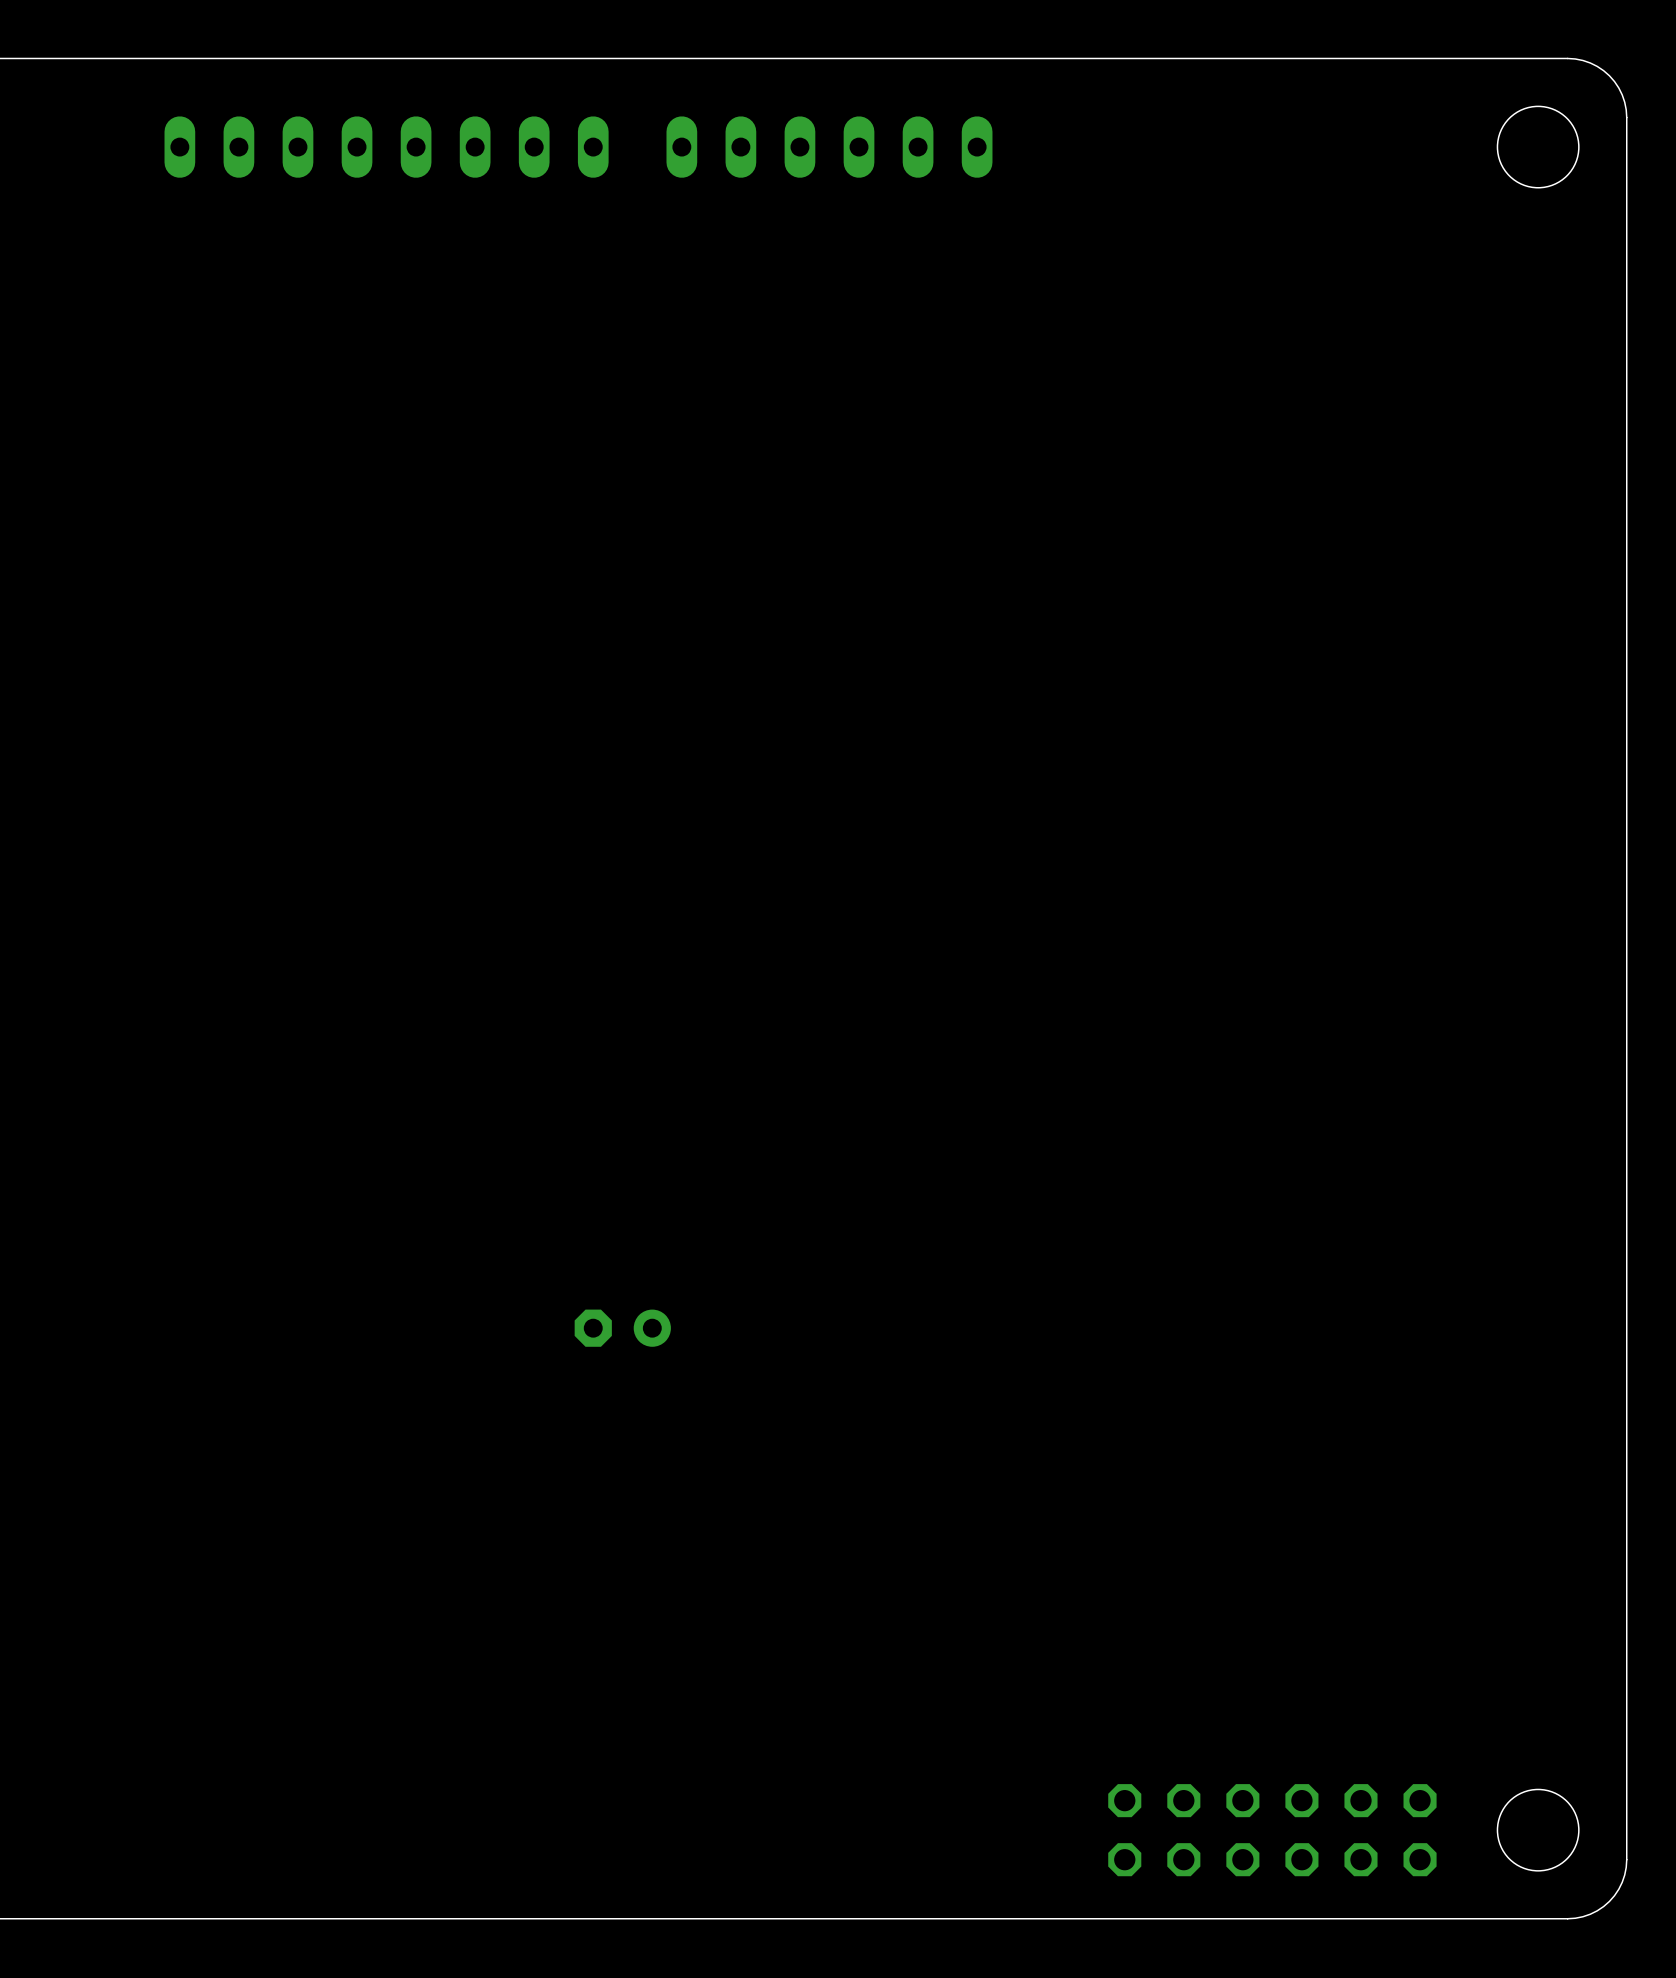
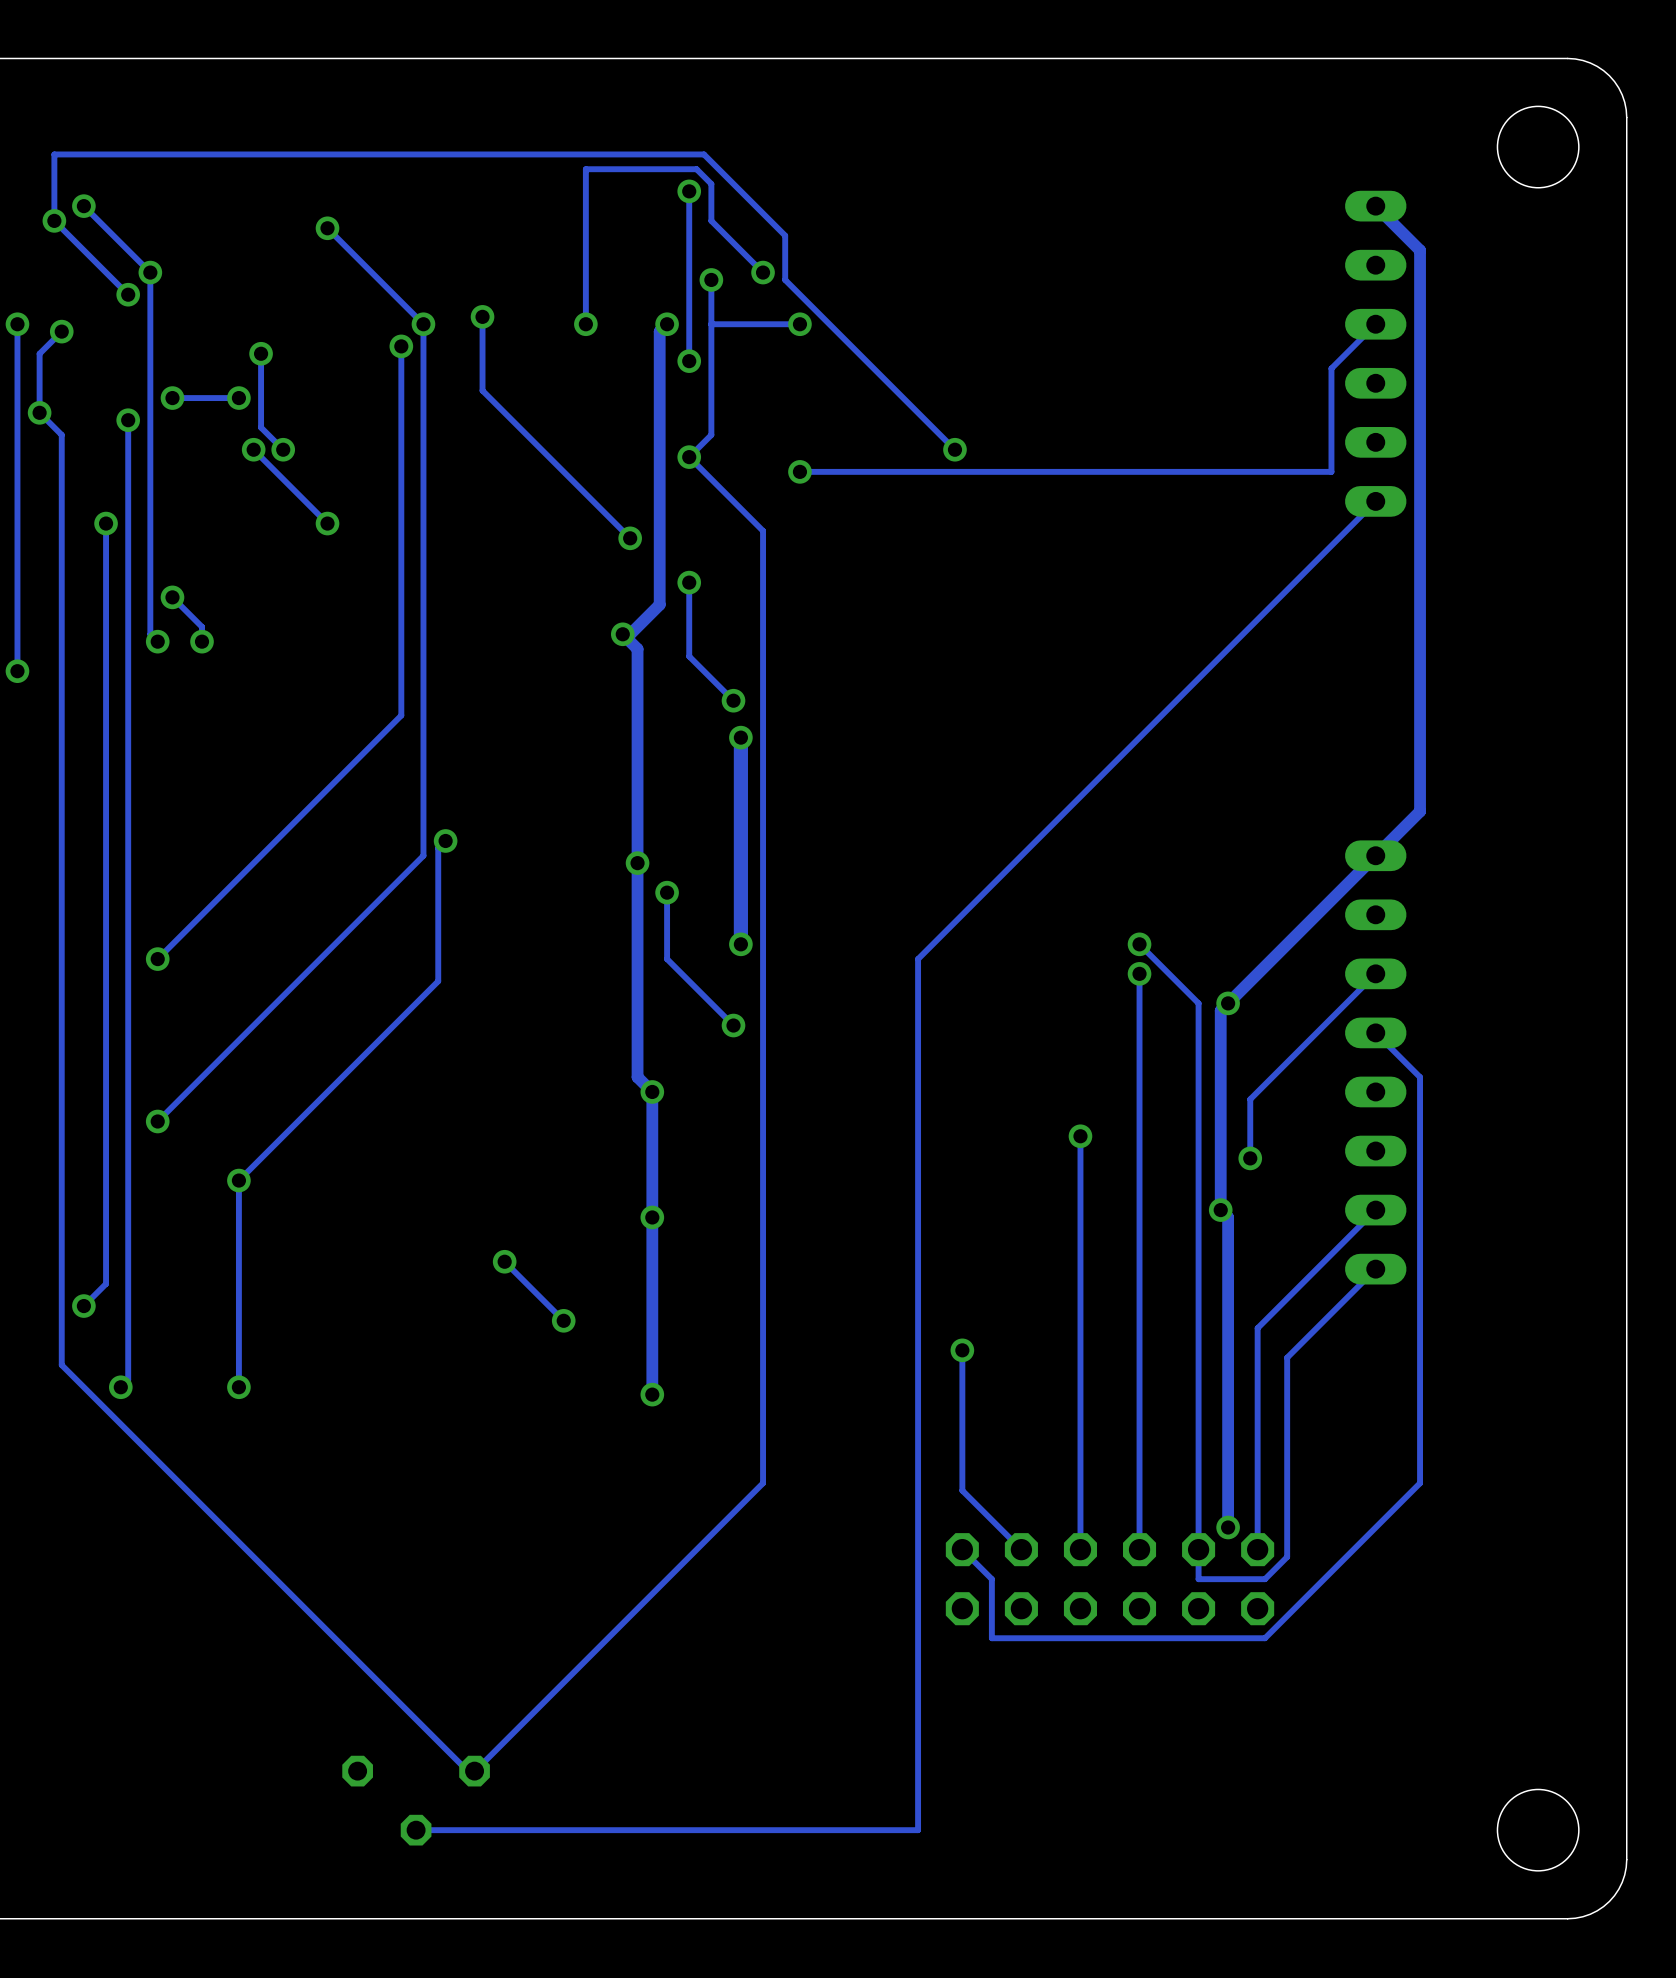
part: (386, 147) -> none
part: (829, 147) -> none
track: none -> (689, 191) (689, 361)
via: none -> (689, 191)
track: none -> (83, 206) (150, 272) (150, 634) (157, 641)
via: none -> (83, 206)
track: none -> (1375, 206) (1420, 250) (1420, 811) (1220, 1010) (1220, 1210) (1228, 1217) (1228, 1527)
via: none -> (54, 220)
track: none -> (327, 228) (423, 324) (423, 855) (157, 1121)
via: none -> (327, 228)
via: none -> (150, 272)
track: none -> (763, 272) (711, 220) (711, 183) (696, 169) (585, 169) (585, 324)
via: none -> (763, 272)
track: none -> (711, 279) (711, 434) (689, 457) (763, 530) (763, 1483) (475, 1771) (467, 1771) (61, 1365) (61, 434) (39, 412) (39, 353) (61, 331)
via: none -> (711, 279)
track: none -> (128, 294) (54, 220) (54, 154) (703, 154) (785, 235) (785, 279) (954, 449)
via: none -> (128, 294)
track: none -> (482, 316) (482, 390) (630, 538)
via: none -> (482, 316)
track: none -> (17, 324) (17, 671)
via: none -> (17, 324)
via: none -> (423, 324)
via: none -> (585, 324)
track: none -> (667, 324) (659, 331) (659, 604) (630, 634) (622, 634) (637, 649) (637, 1077) (652, 1091) (652, 1394)
via: none -> (667, 324)
track: none -> (799, 324) (711, 324)
via: none -> (799, 324)
track: none -> (1375, 324) (1331, 368) (1331, 471) (799, 471)
via: none -> (61, 331)
track: none -> (401, 346) (401, 715) (157, 959)
via: none -> (401, 346)
track: none -> (261, 353) (261, 427) (283, 449)
via: none -> (261, 353)
part: none -> (1375, 353)
via: none -> (689, 361)
via: none -> (172, 398)
track: none -> (238, 398) (172, 398)
via: none -> (238, 398)
via: none -> (39, 412)
track: none -> (128, 420) (128, 1379) (120, 1387)
via: none -> (128, 420)
track: none -> (253, 449) (327, 523)
via: none -> (253, 449)
via: none -> (283, 449)
via: none -> (954, 449)
via: none -> (689, 457)
via: none -> (799, 471)
track: none -> (1375, 501) (918, 959) (918, 1830) (416, 1830)
track: none -> (106, 523) (106, 1283) (83, 1306)
via: none -> (106, 523)
via: none -> (327, 523)
via: none -> (630, 538)
track: none -> (689, 582) (689, 656) (733, 700)
via: none -> (689, 582)
track: none -> (172, 597) (202, 626) (202, 641)
via: none -> (172, 597)
via: none -> (622, 634)
via: none -> (157, 641)
via: none -> (202, 641)
via: none -> (17, 671)
via: none -> (733, 700)
track: none -> (740, 737) (740, 944)
via: none -> (740, 737)
track: none -> (445, 840) (438, 848) (438, 981) (238, 1180) (238, 1387)
via: none -> (445, 840)
via: none -> (637, 863)
track: none -> (667, 892) (667, 959) (733, 1025)
via: none -> (667, 892)
via: none -> (740, 944)
track: none -> (1139, 944) (1198, 1003) (1198, 1579) (1265, 1579) (1287, 1557) (1287, 1357) (1375, 1269)
via: none -> (1139, 944)
via: none -> (157, 959)
track: none -> (1139, 973) (1139, 1549)
via: none -> (1139, 973)
track: none -> (1375, 973) (1250, 1099) (1250, 1158)
via: none -> (1228, 1003)
via: none -> (733, 1025)
track: none -> (1375, 1032) (1420, 1077) (1420, 1483) (1265, 1638) (991, 1638) (991, 1579) (962, 1549)
part: none -> (1375, 1062)
via: none -> (652, 1091)
via: none -> (157, 1121)
track: none -> (1080, 1136) (1080, 1549)
via: none -> (1080, 1136)
via: none -> (1250, 1158)
via: none -> (238, 1180)
via: none -> (1220, 1210)
track: none -> (1375, 1210) (1257, 1328) (1257, 1549)
via: none -> (652, 1217)
track: none -> (504, 1261) (563, 1320)
via: none -> (504, 1261)
via: none -> (83, 1306)
via: none -> (563, 1320)
part: (622, 1328) -> none
track: none -> (962, 1350) (962, 1490) (1021, 1549)
via: none -> (962, 1350)
via: none -> (120, 1387)
via: none -> (238, 1387)
via: none -> (652, 1394)
via: none -> (1228, 1527)
part: none -> (416, 1800)
part position: (1272, 1830) -> (1110, 1579)

